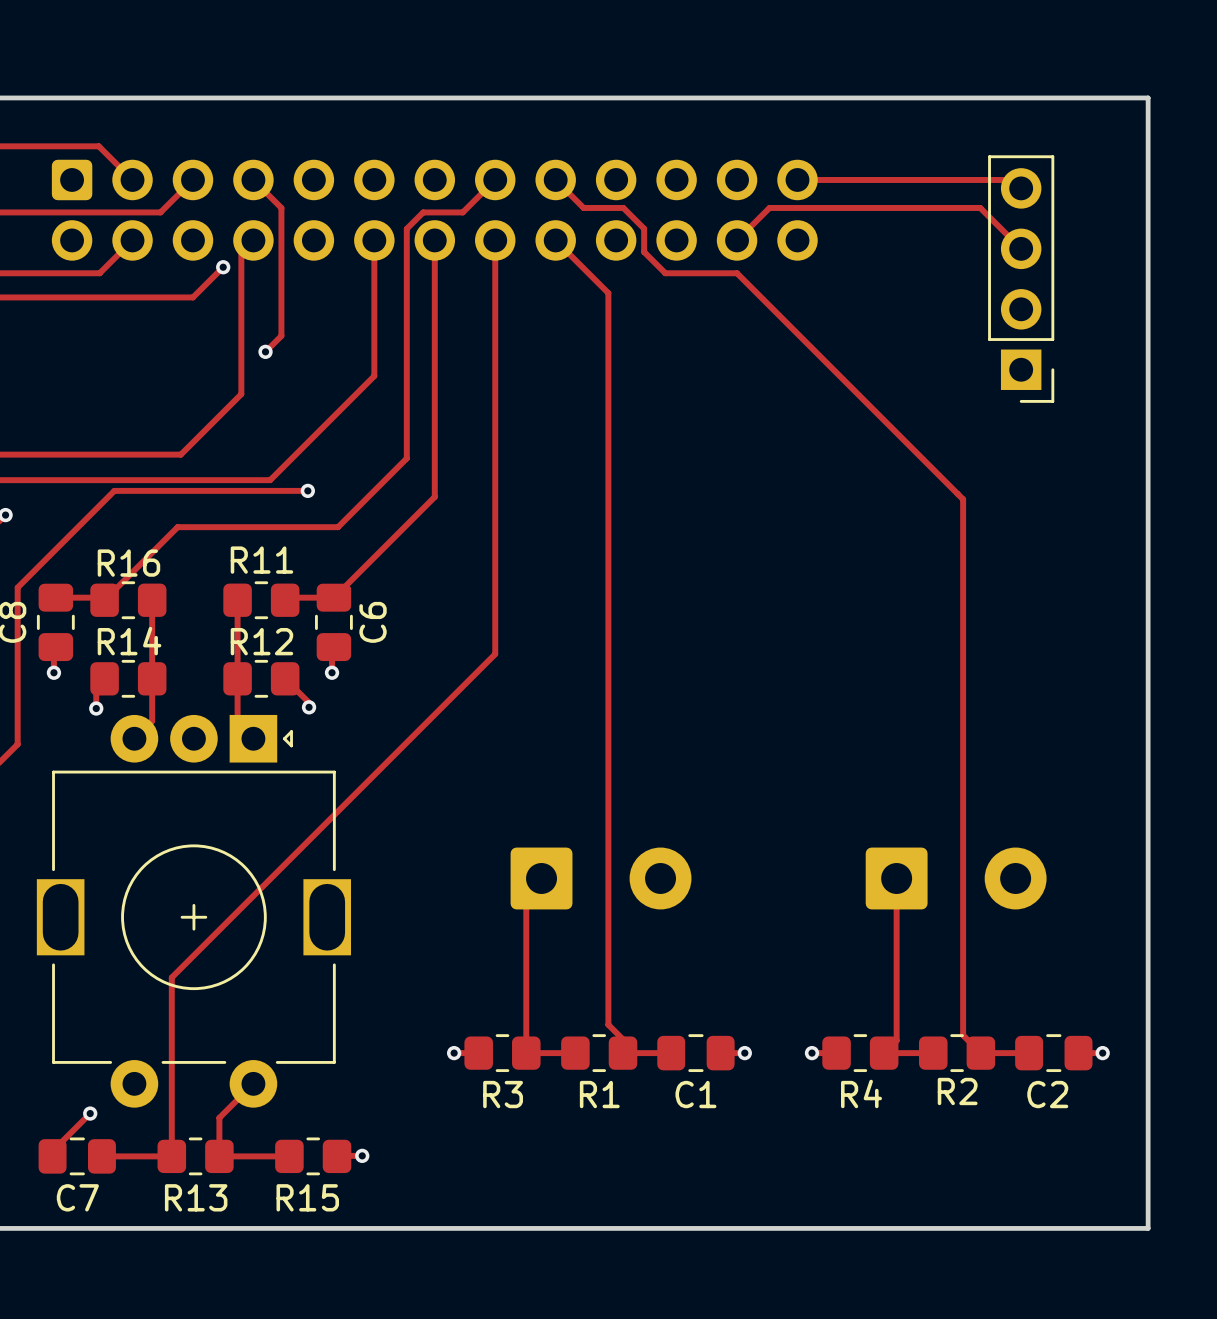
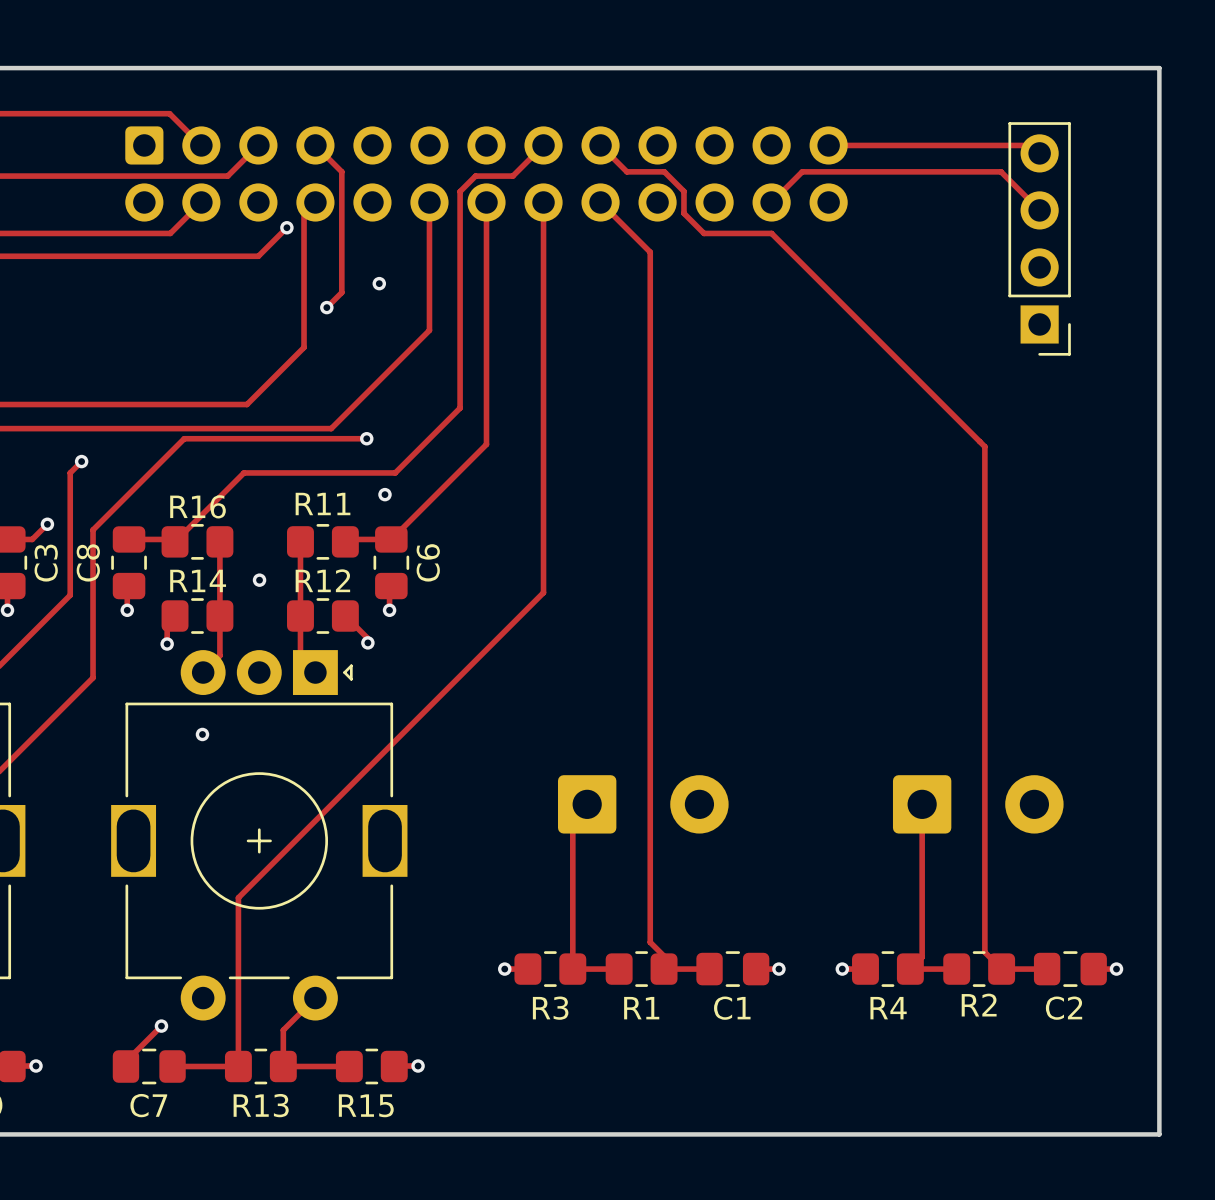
via: none -> (379, 283)
via: none -> (384, 494)
via: none -> (259, 580)
via: none -> (202, 734)

